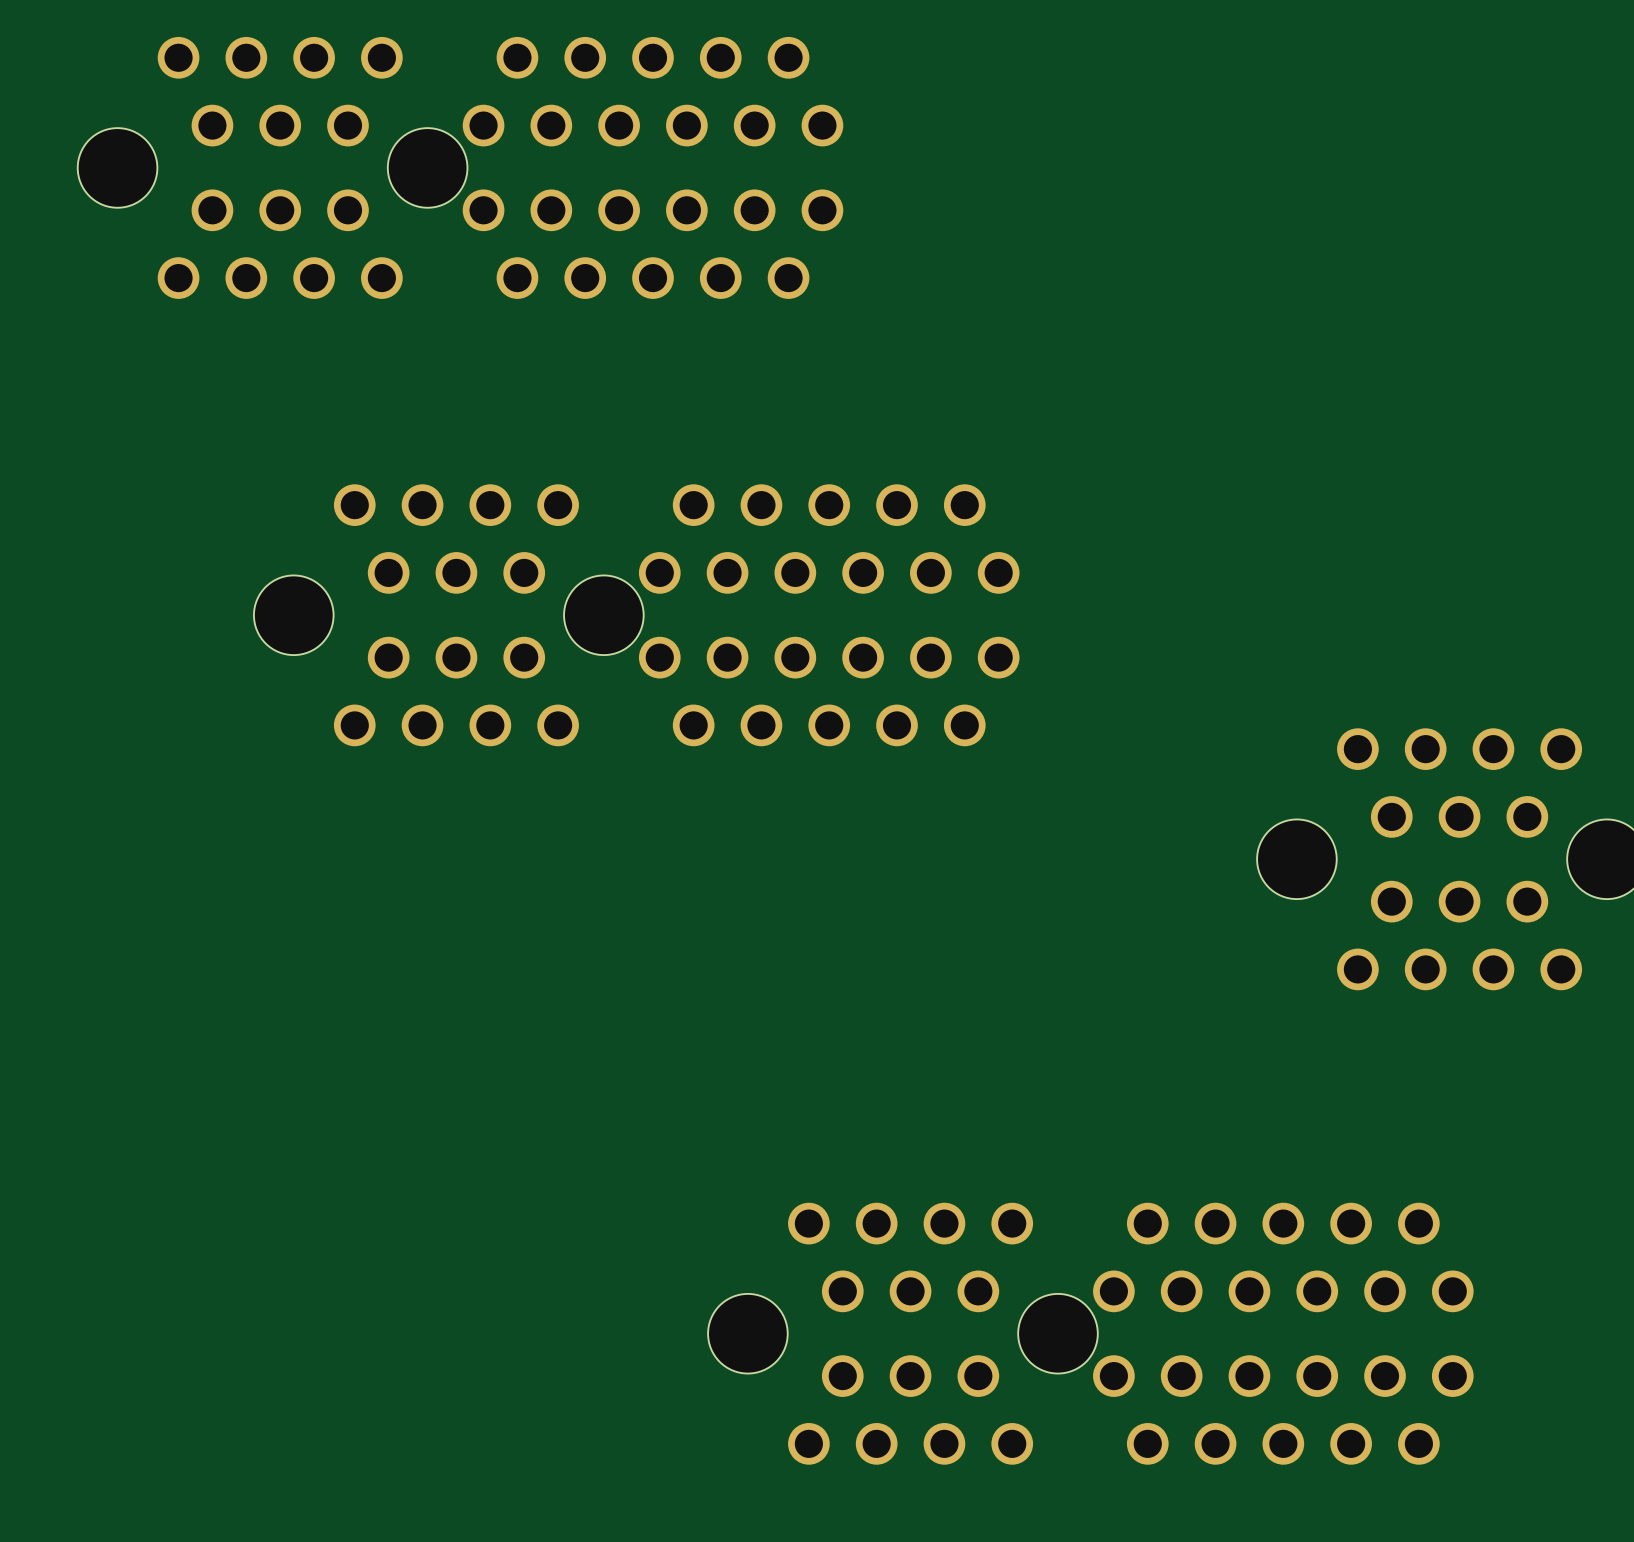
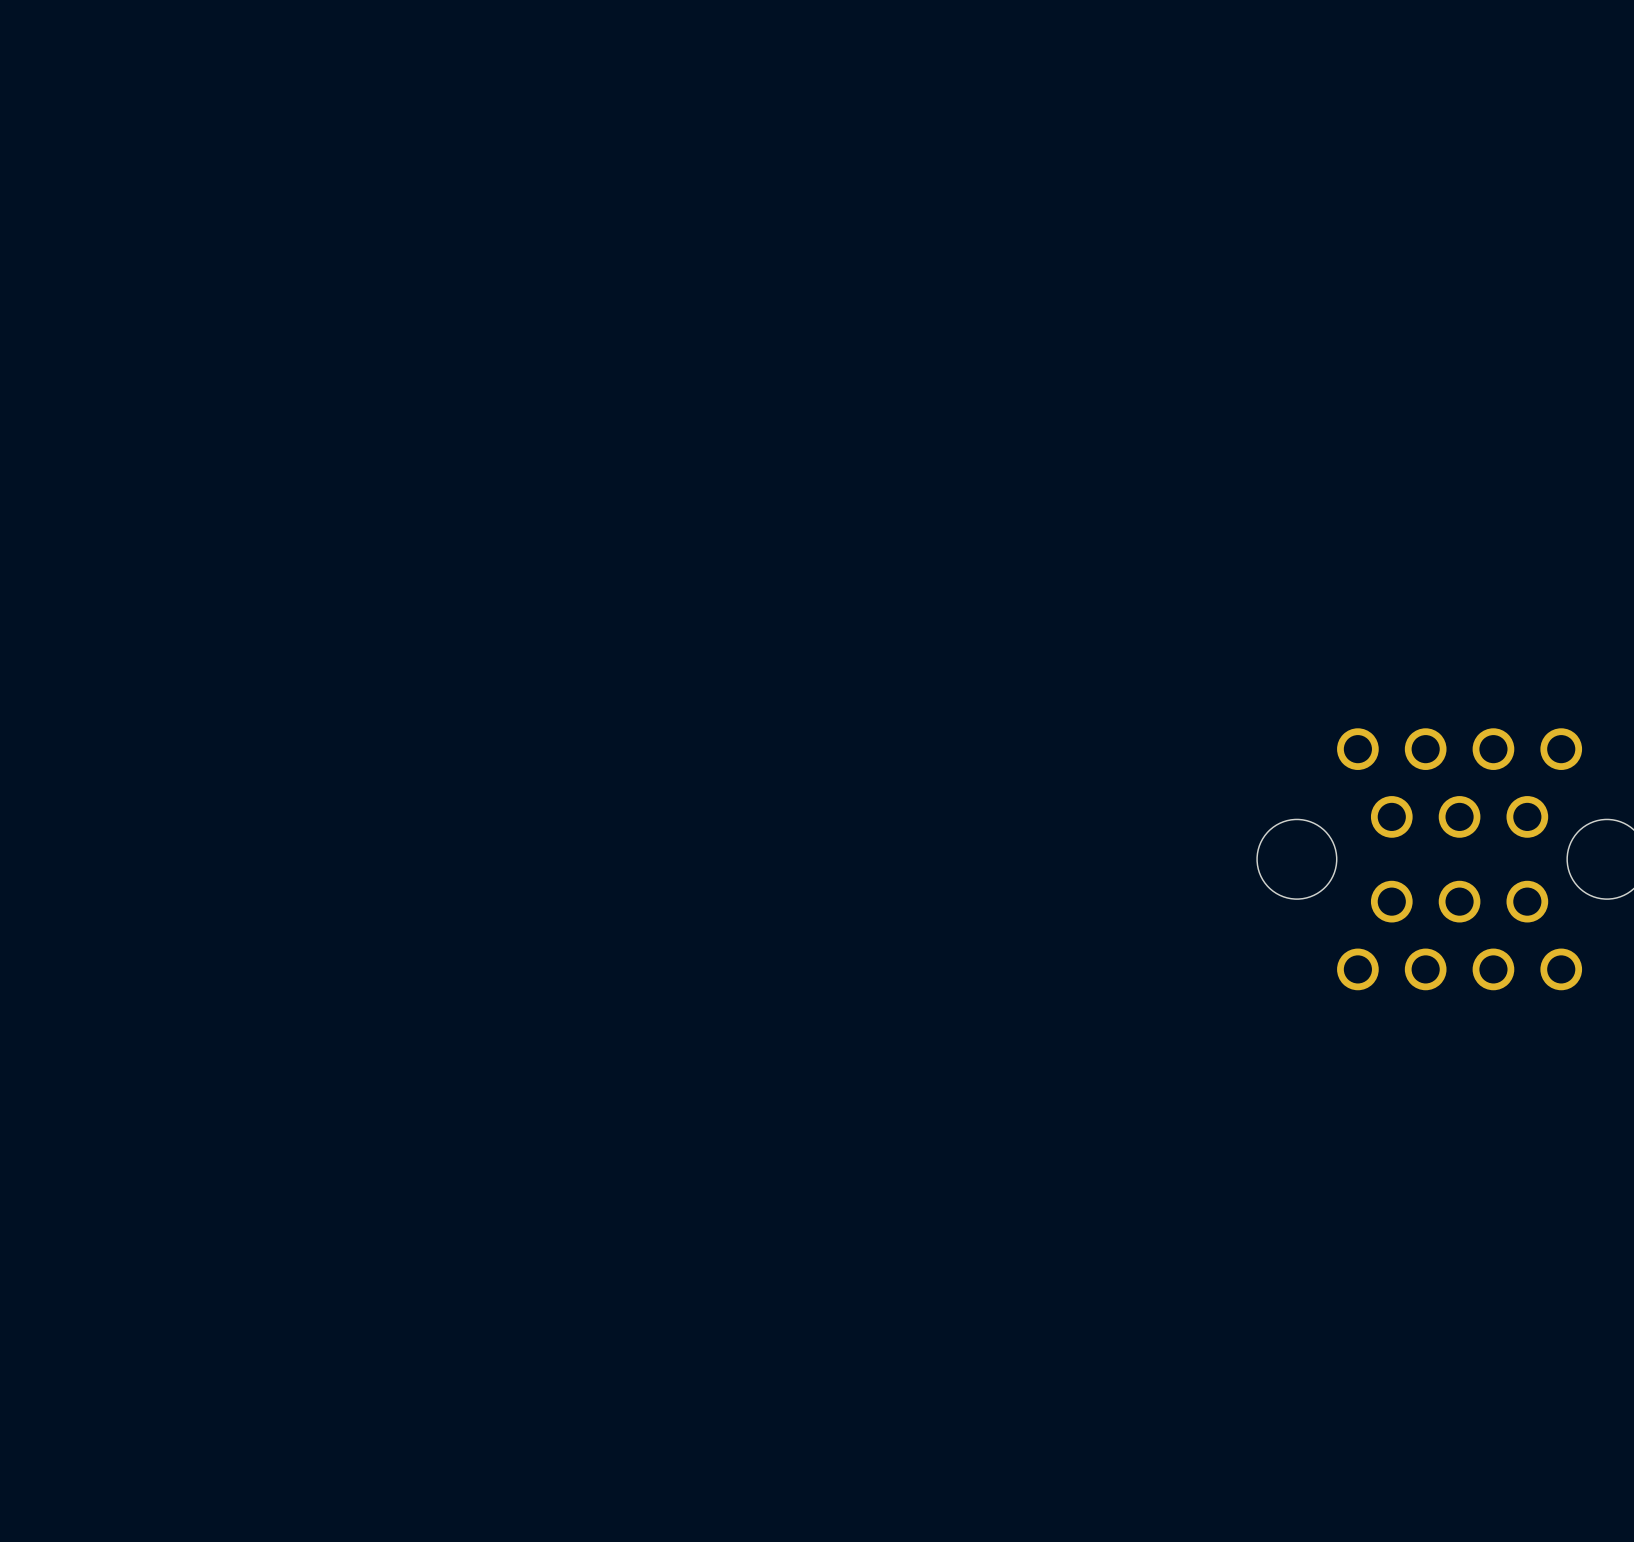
part: (460, 167) -> none
part: (636, 615) -> none
part: (1090, 1333) -> none

